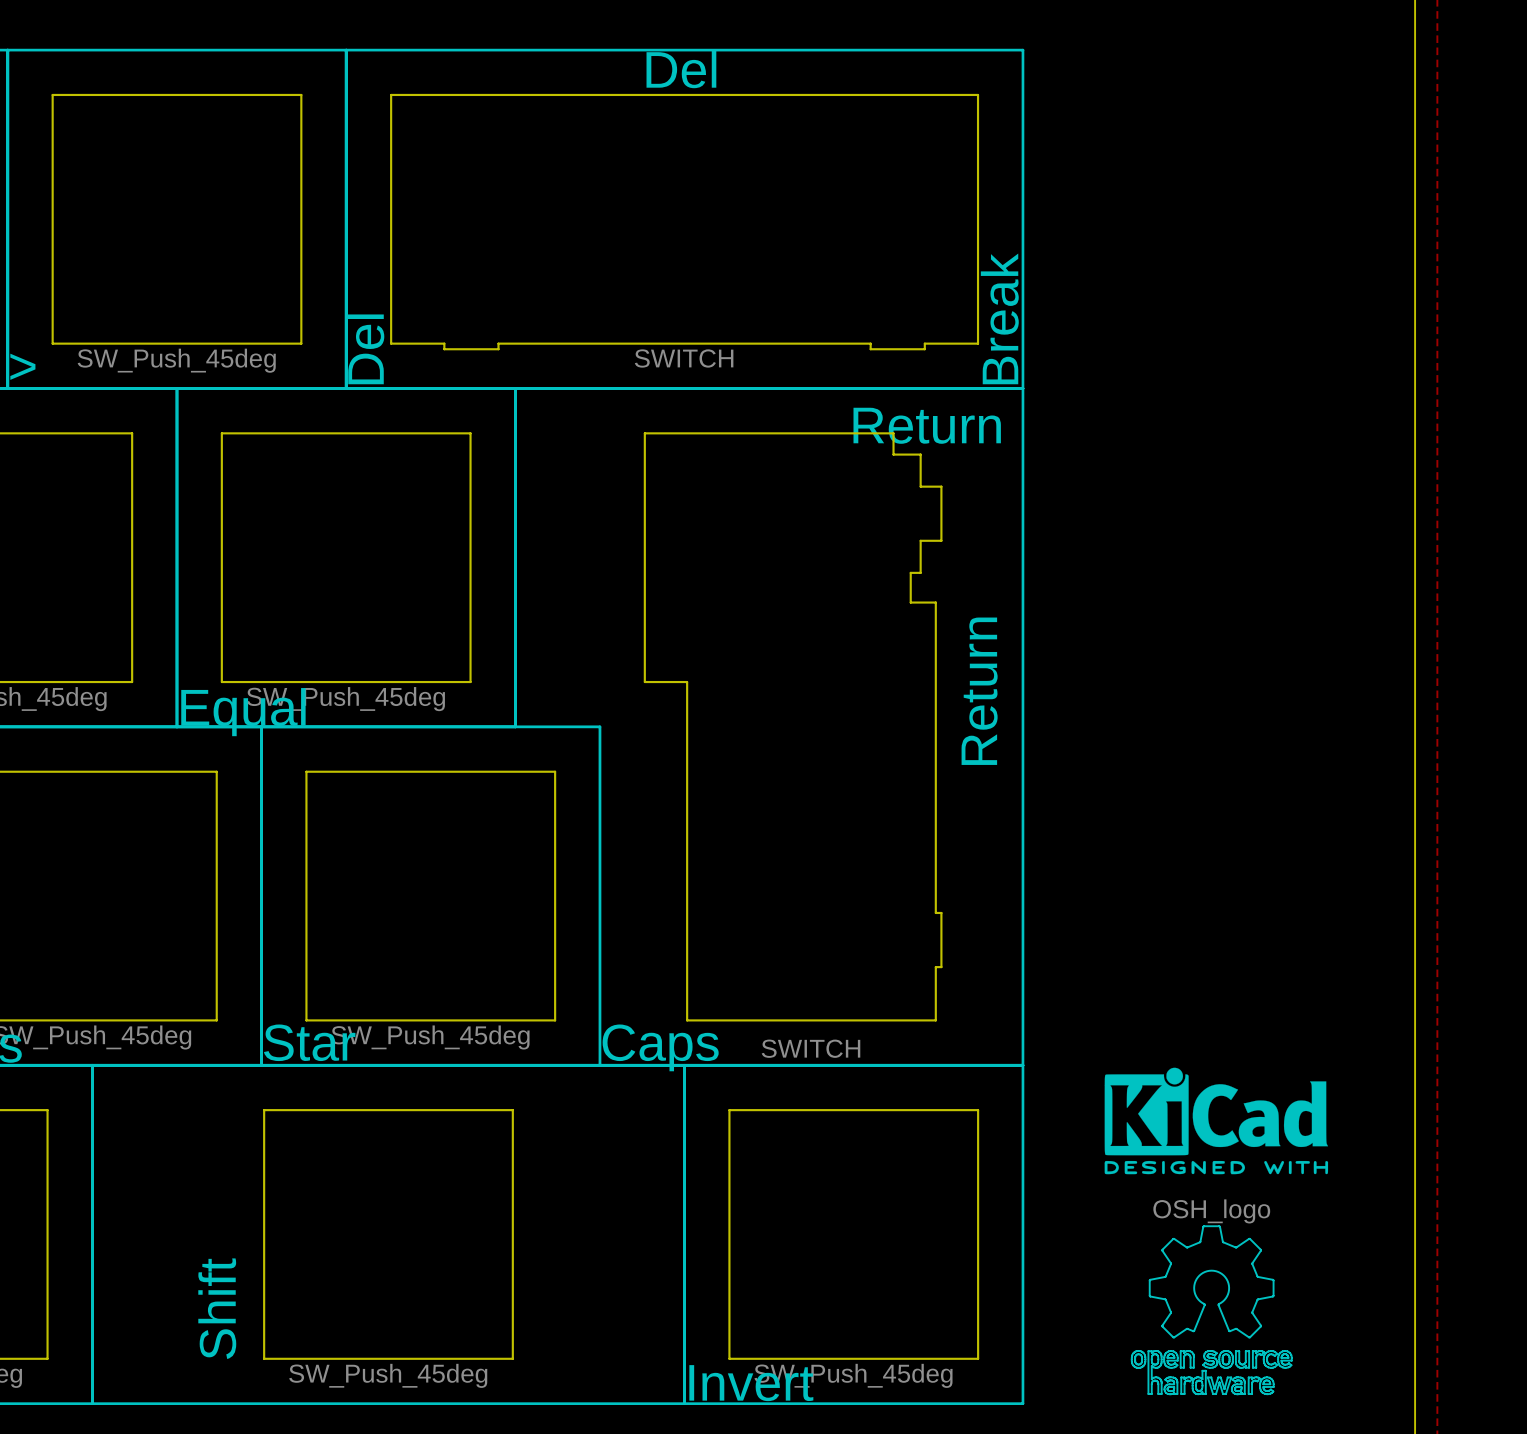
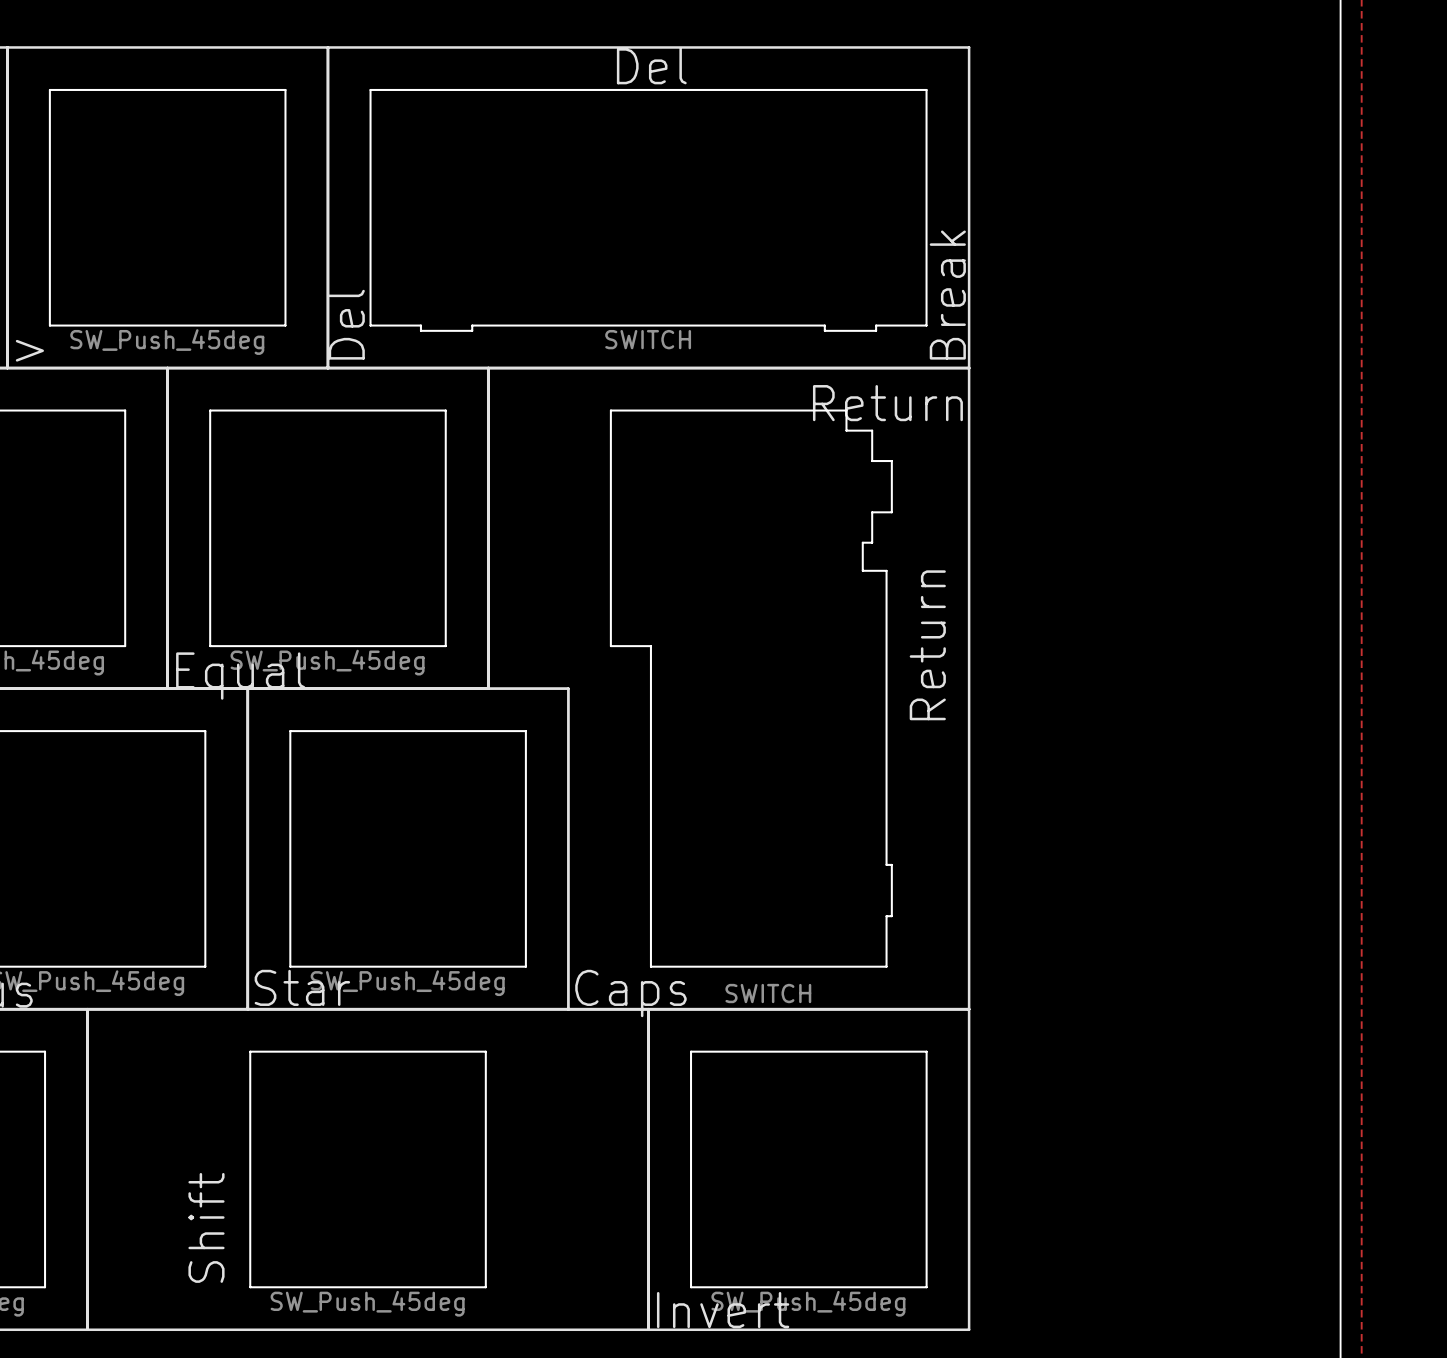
drawing: [1104, 1067, 1329, 1396] -> none

